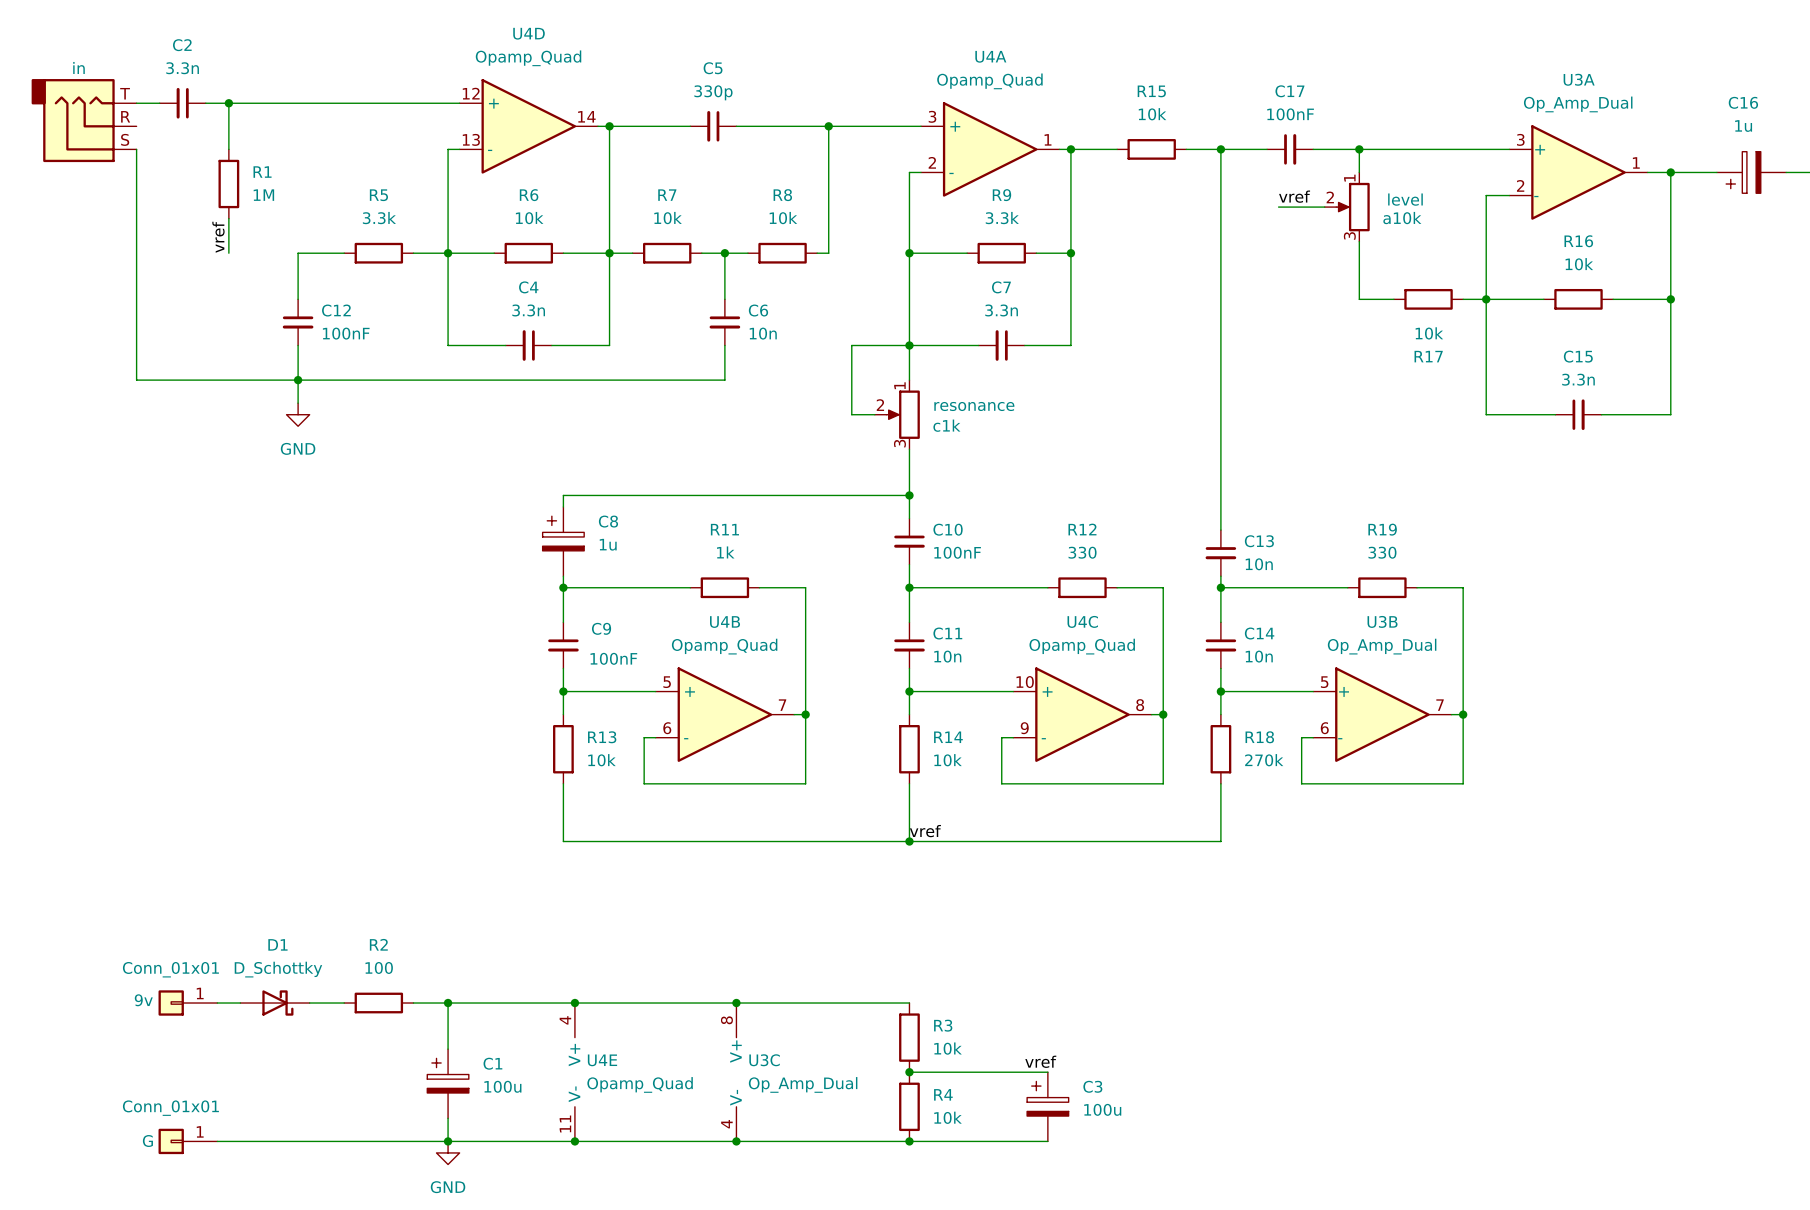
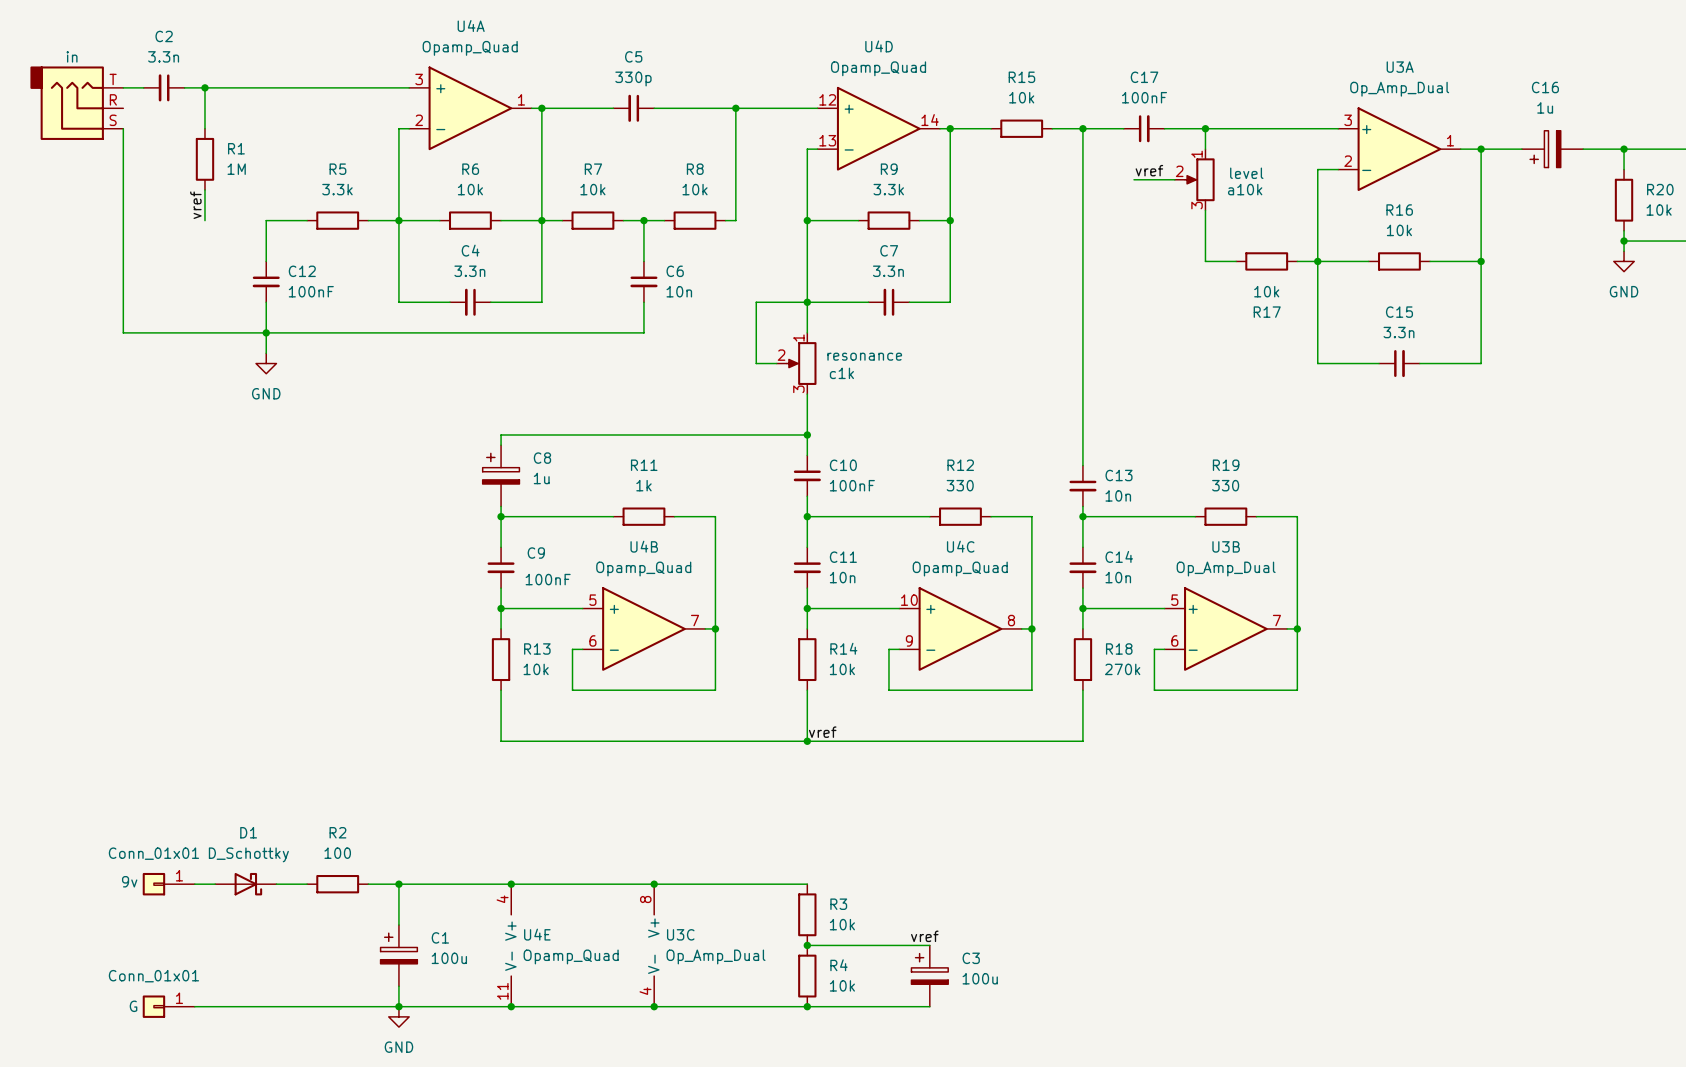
U4D position: (528, 126) -> (878, 128)
U4A position: (990, 149) -> (470, 108)

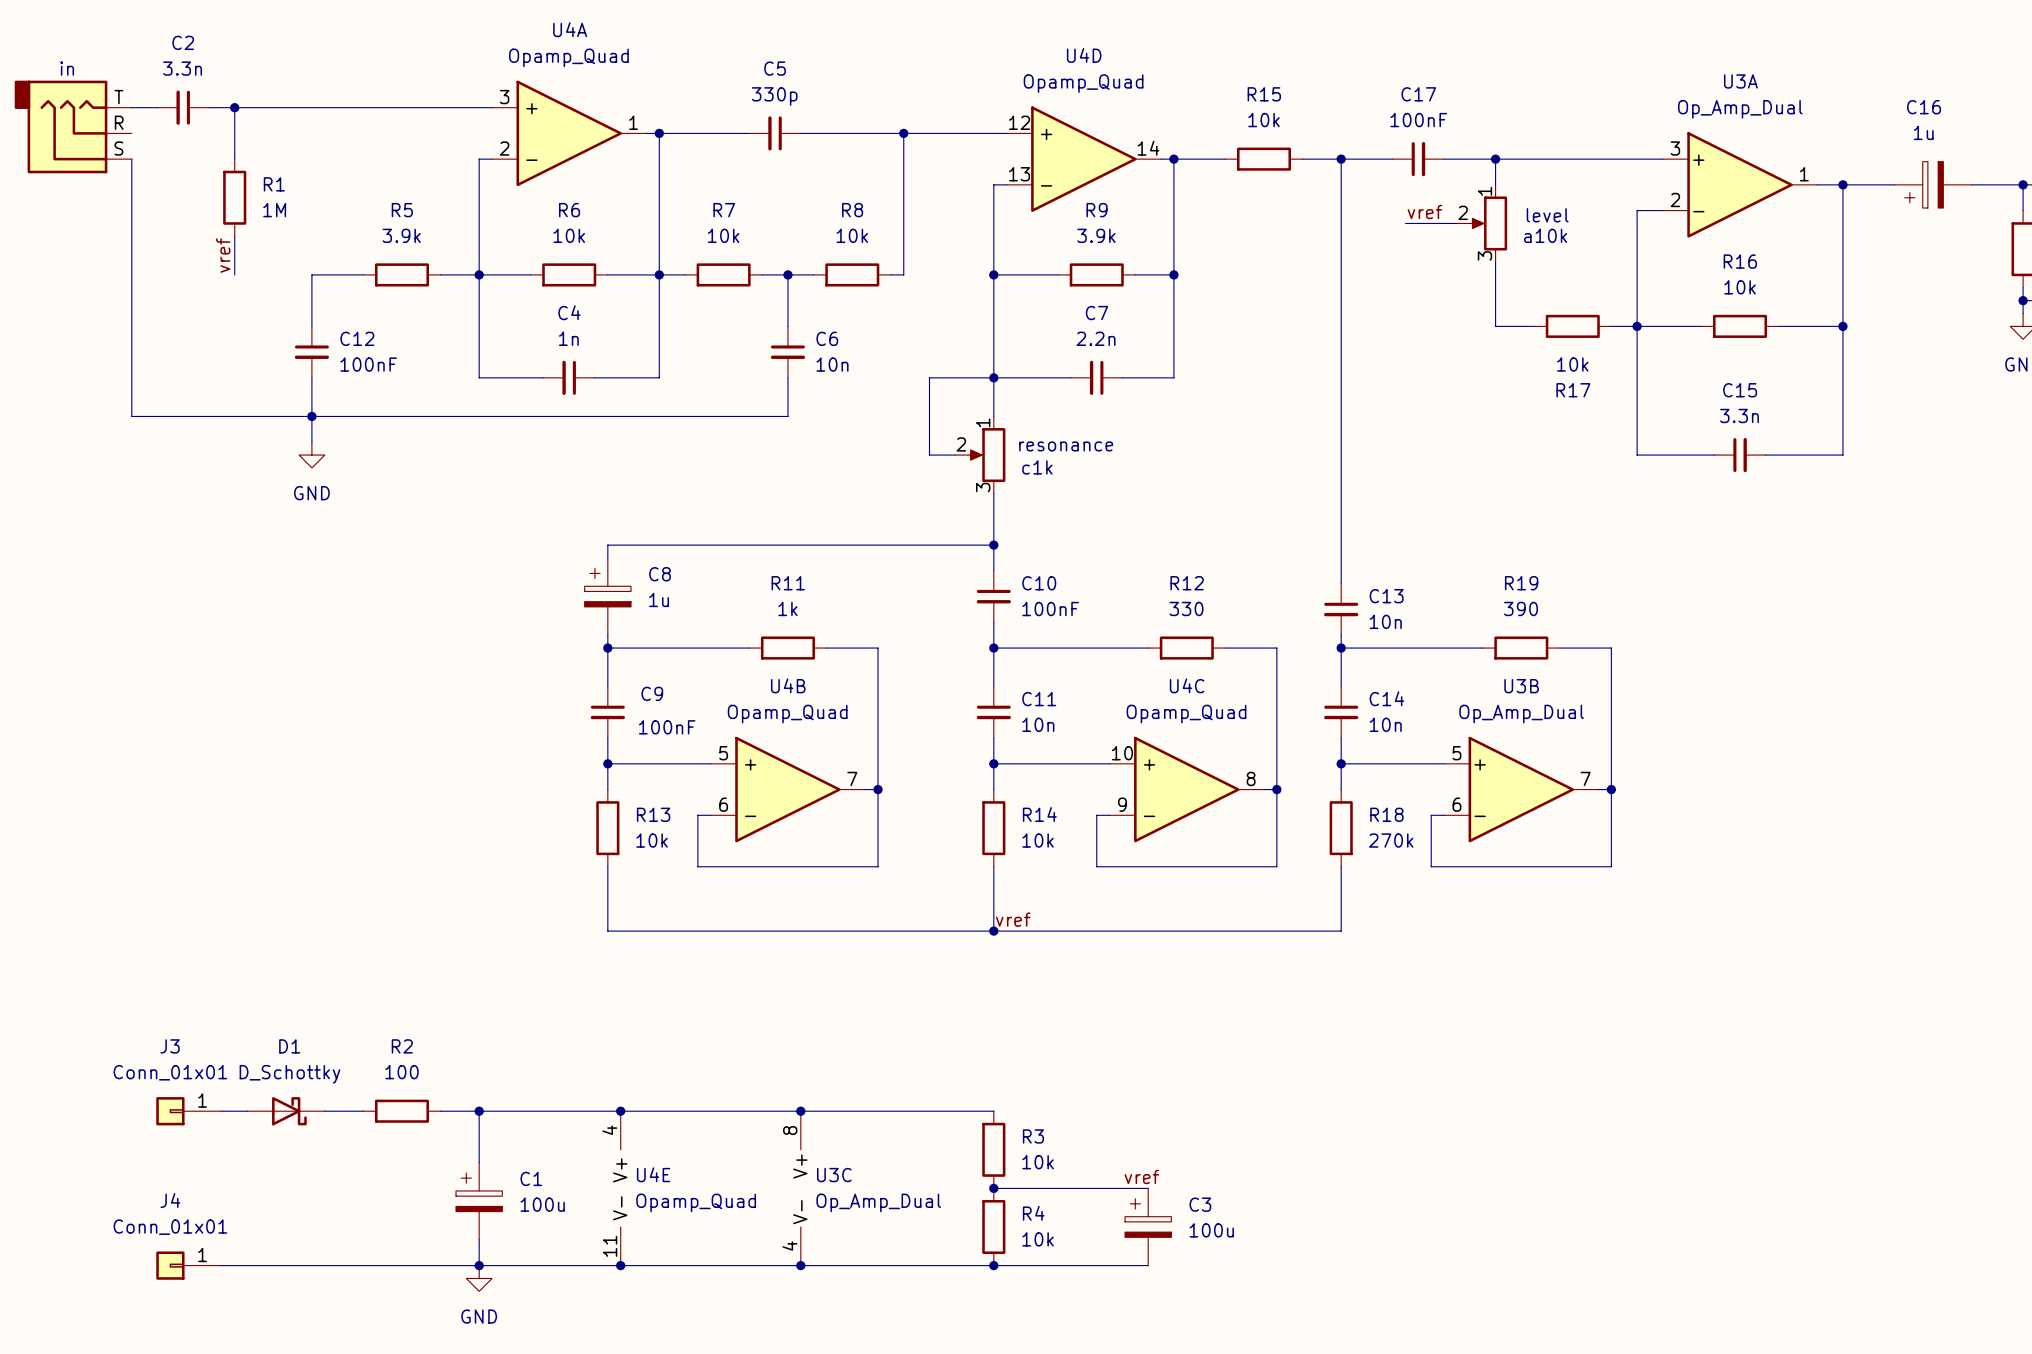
R5 value: 3.3k (337, 189) -> 3.9k (401, 235)
R9 value: 3.3k (888, 189) -> 3.9k (1096, 235)
C4 value: 3.3n (469, 271) -> 1n (568, 338)
C7 value: 3.3n (888, 271) -> 2.2n (1096, 338)
R19 value: 330 (1225, 485) -> 390 (1521, 608)
J3 name: none -> J3 (170, 1046)
J3 text: 9v (129, 881) -> none
J4 name: none -> J4 (170, 1200)
J4 text: G (133, 1006) -> none

